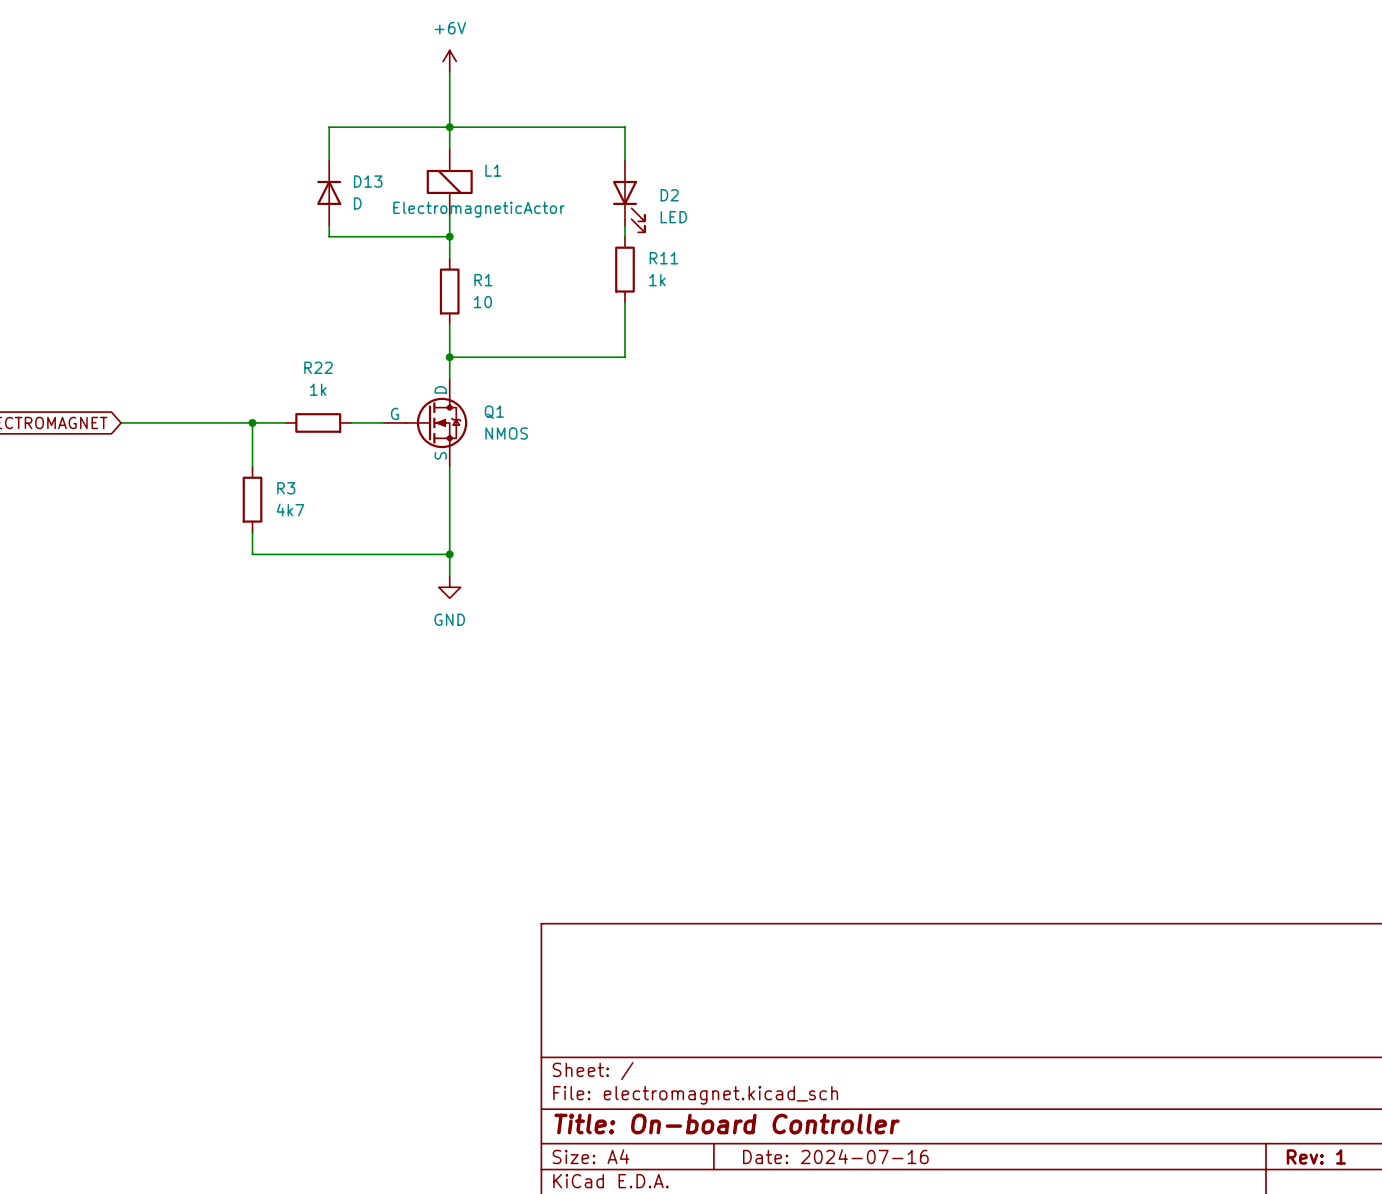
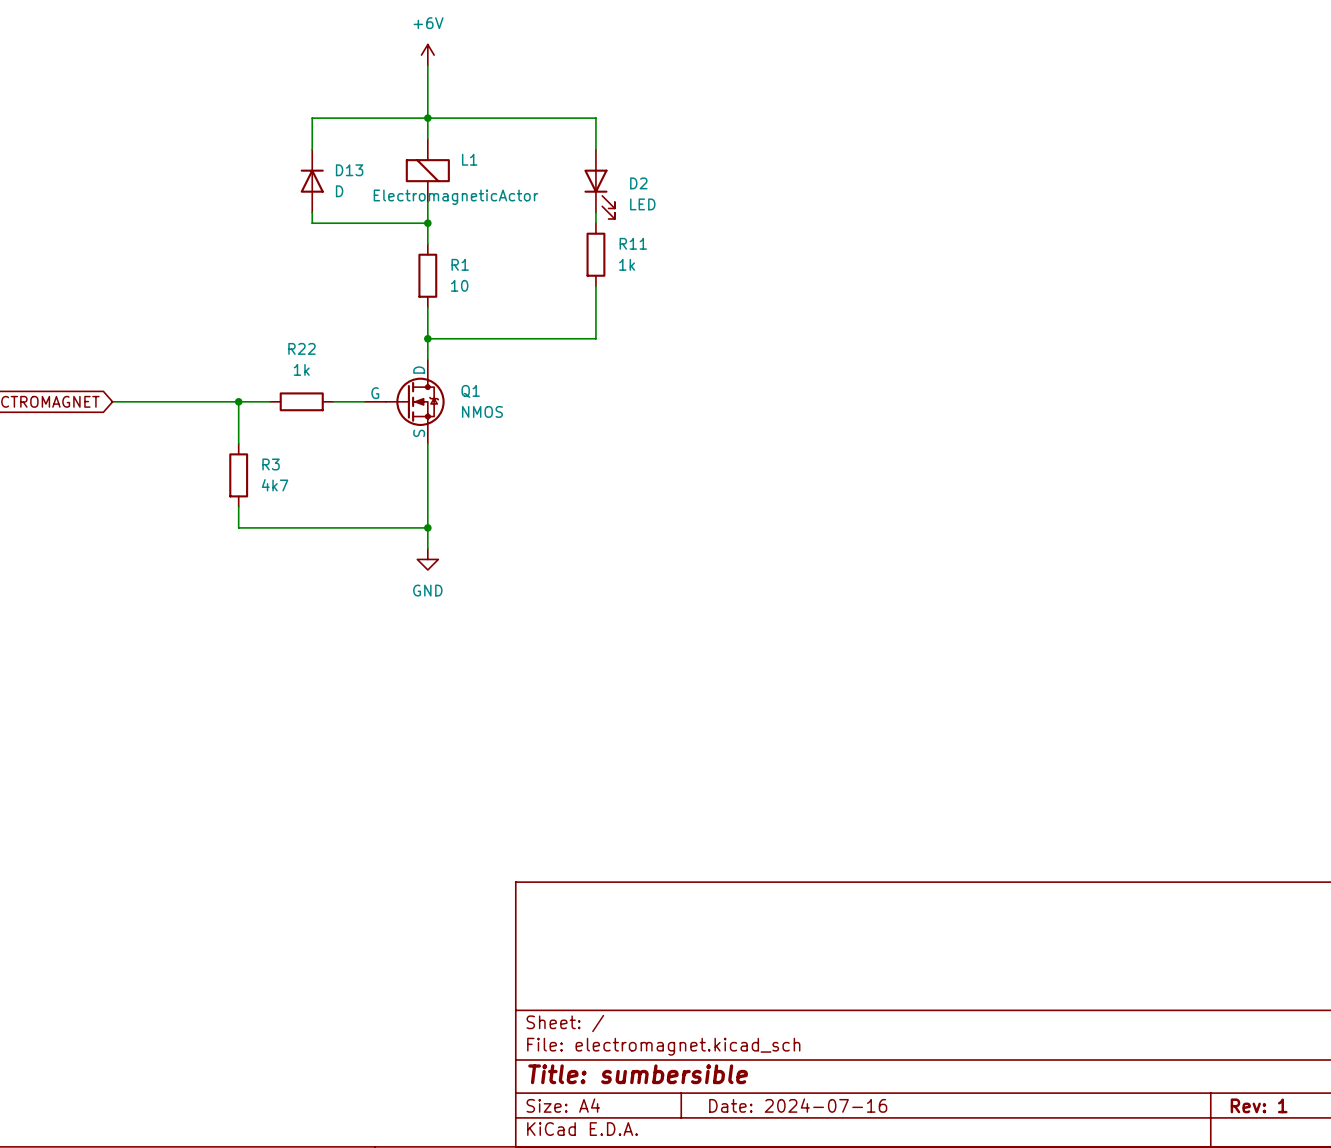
title block: Title: On-board Controller (727, 1124) -> Title: sumbersible (638, 1074)

